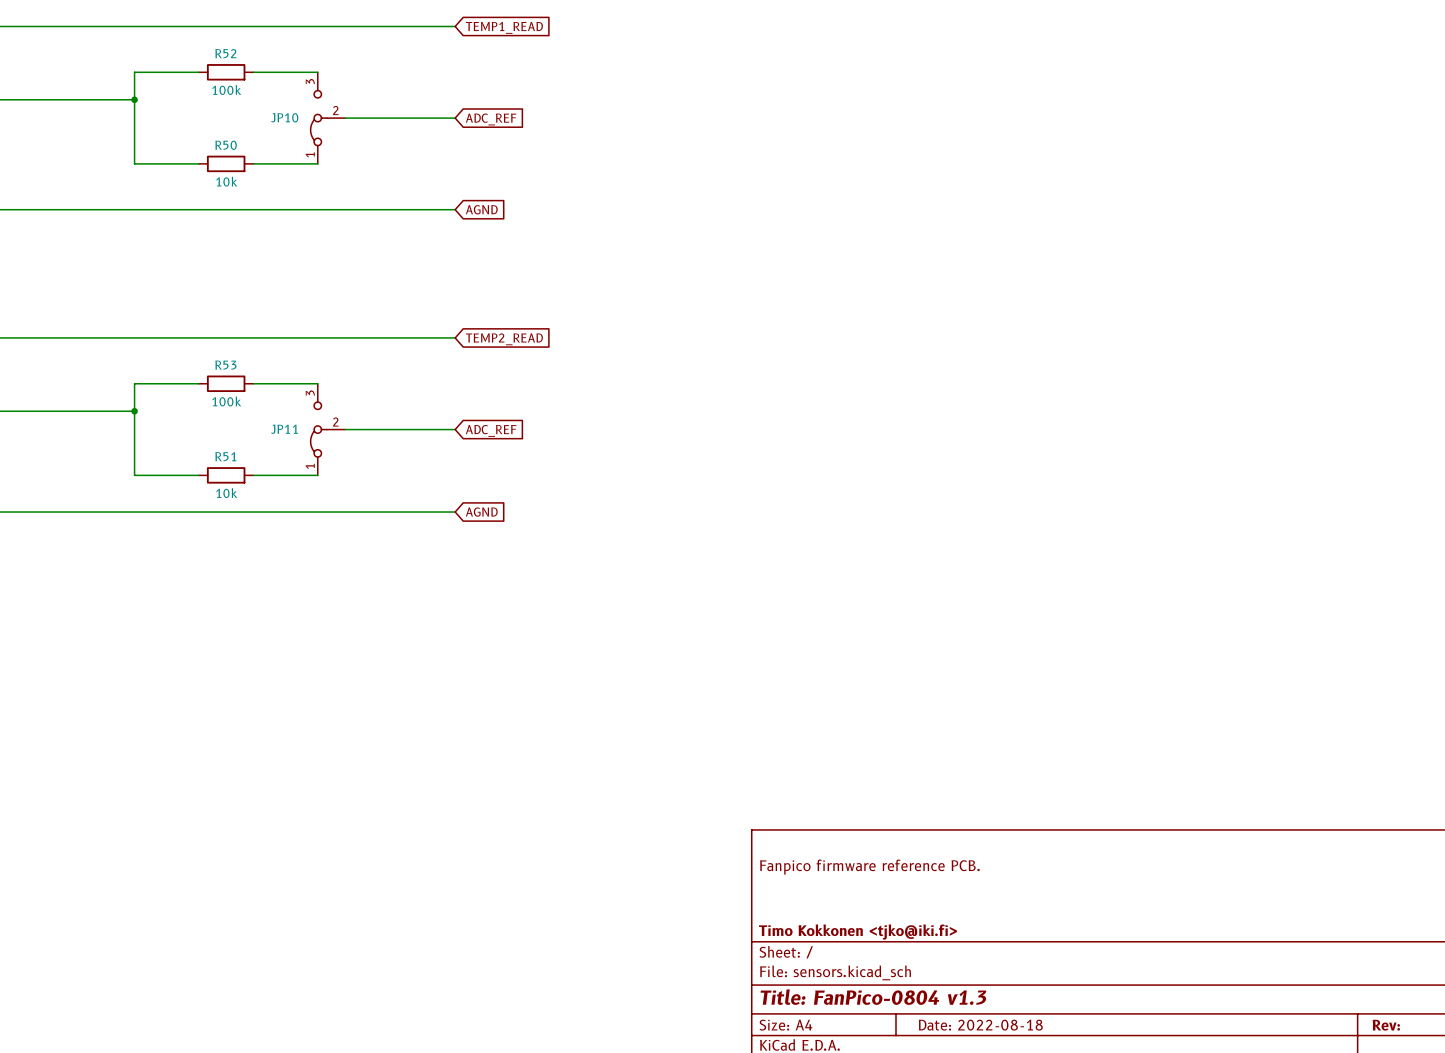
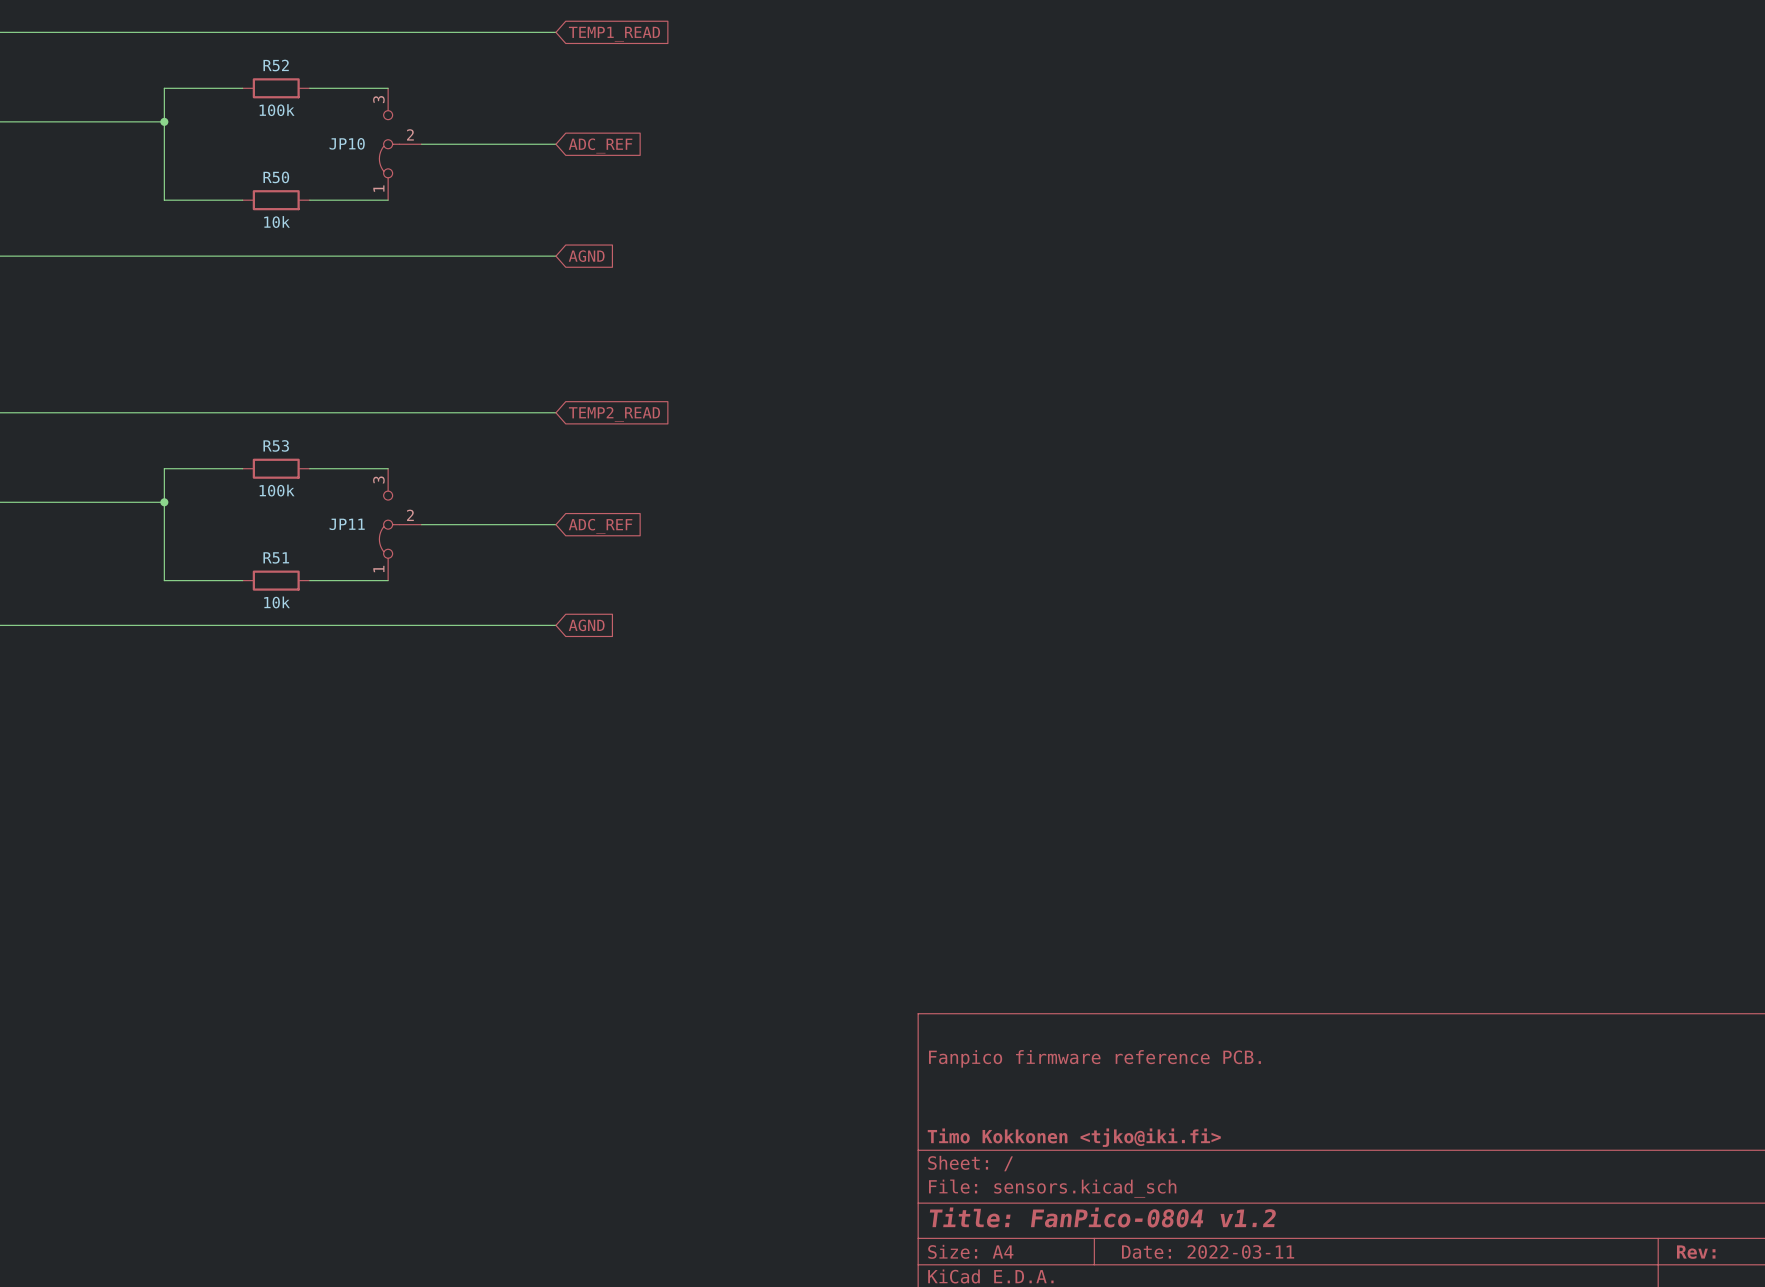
title block: Title: FanPico-0804 v1.3 (873, 997) -> Title: FanPico-0804 v1.2 (1102, 1217)
title block: Date: 2022-08-18 (980, 1025) -> Date: 2022-03-11 (1208, 1251)

